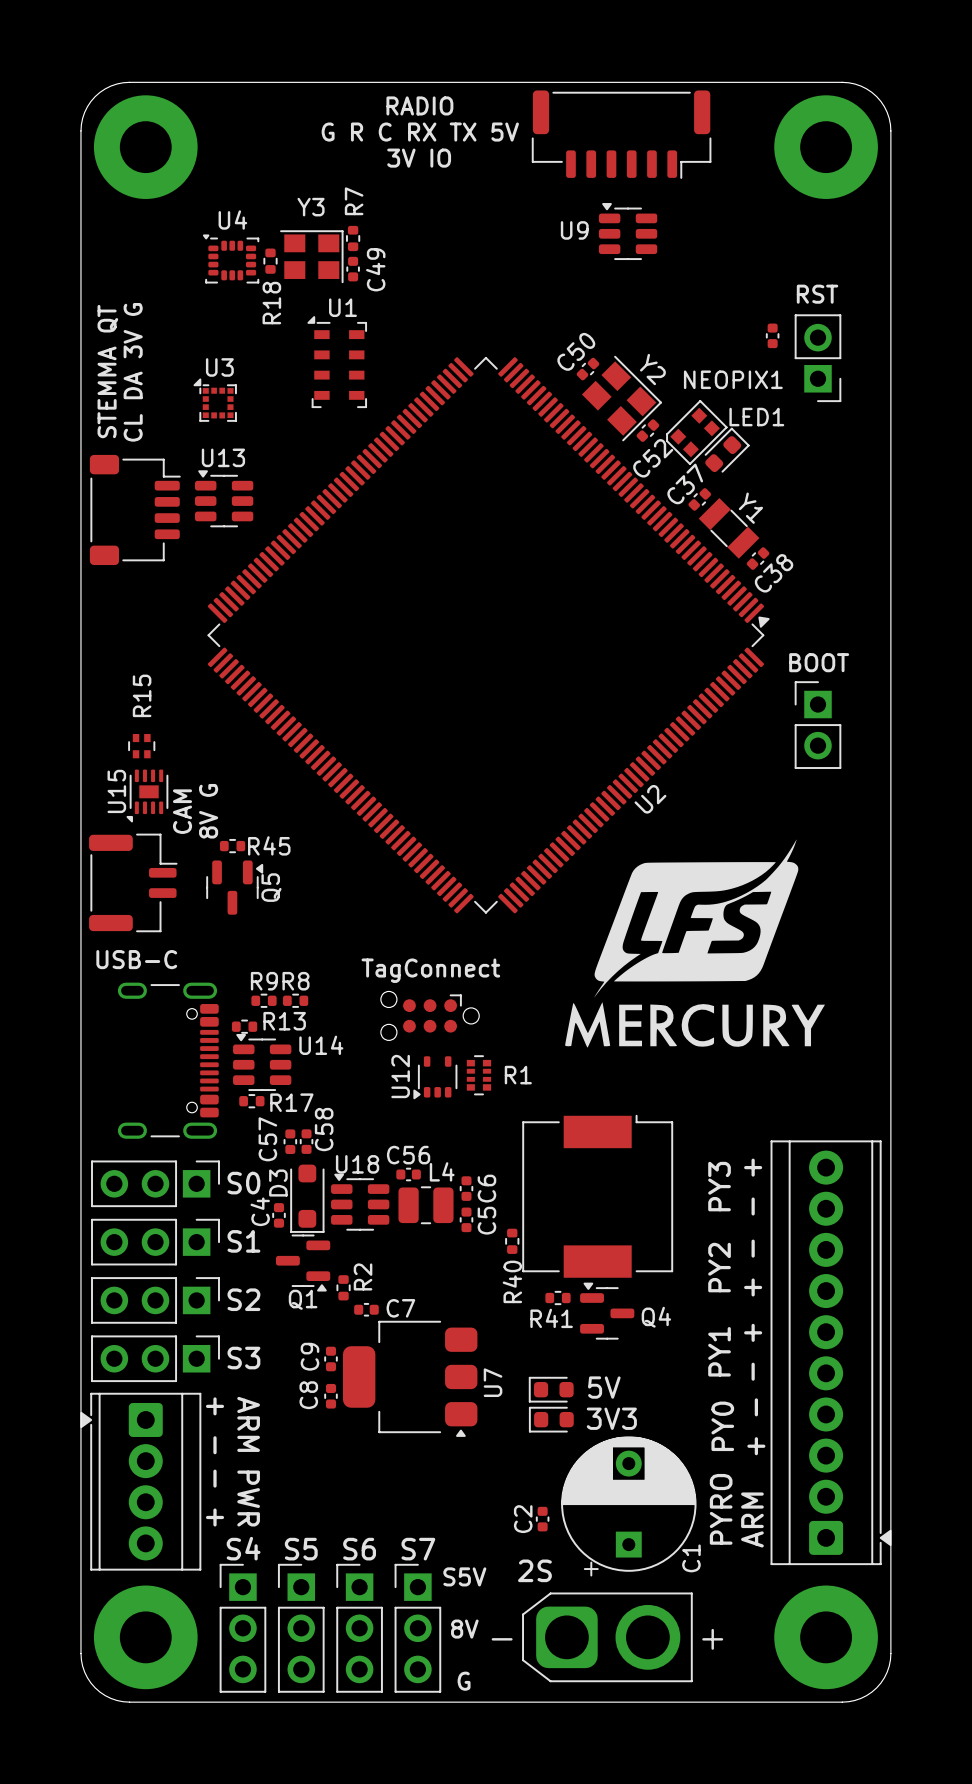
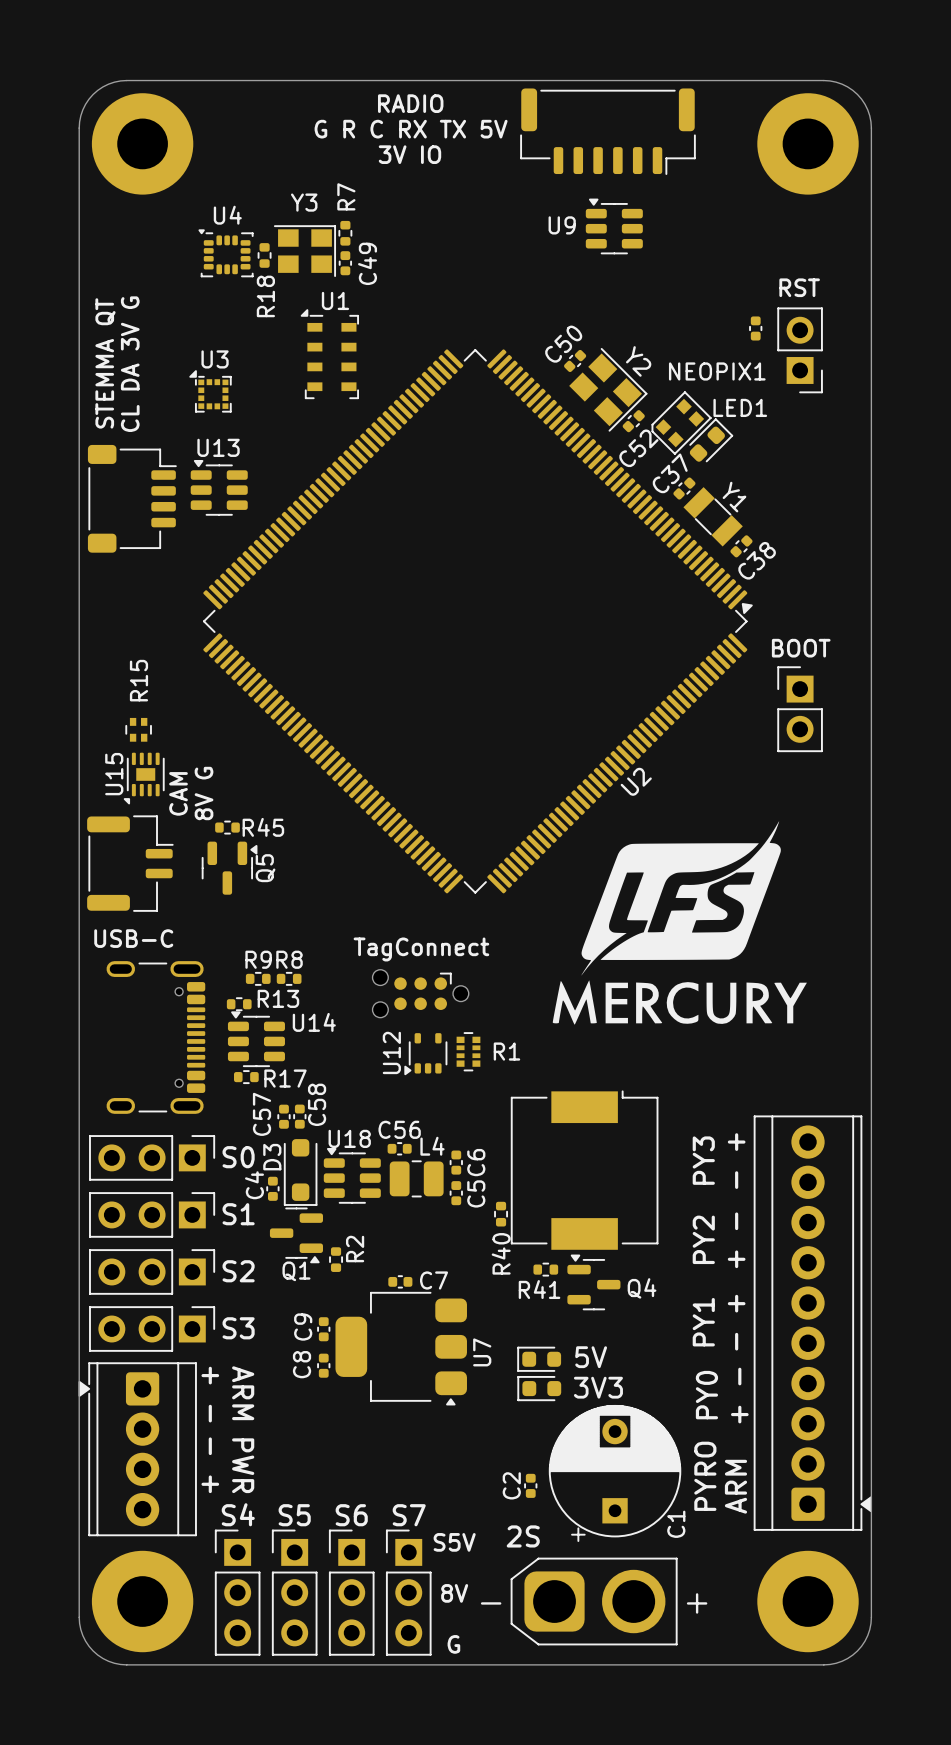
part footprint: [117, 982, 219, 1139] -> [106, 961, 206, 1114]
C7 position: (366, 1309) -> (400, 1281)

